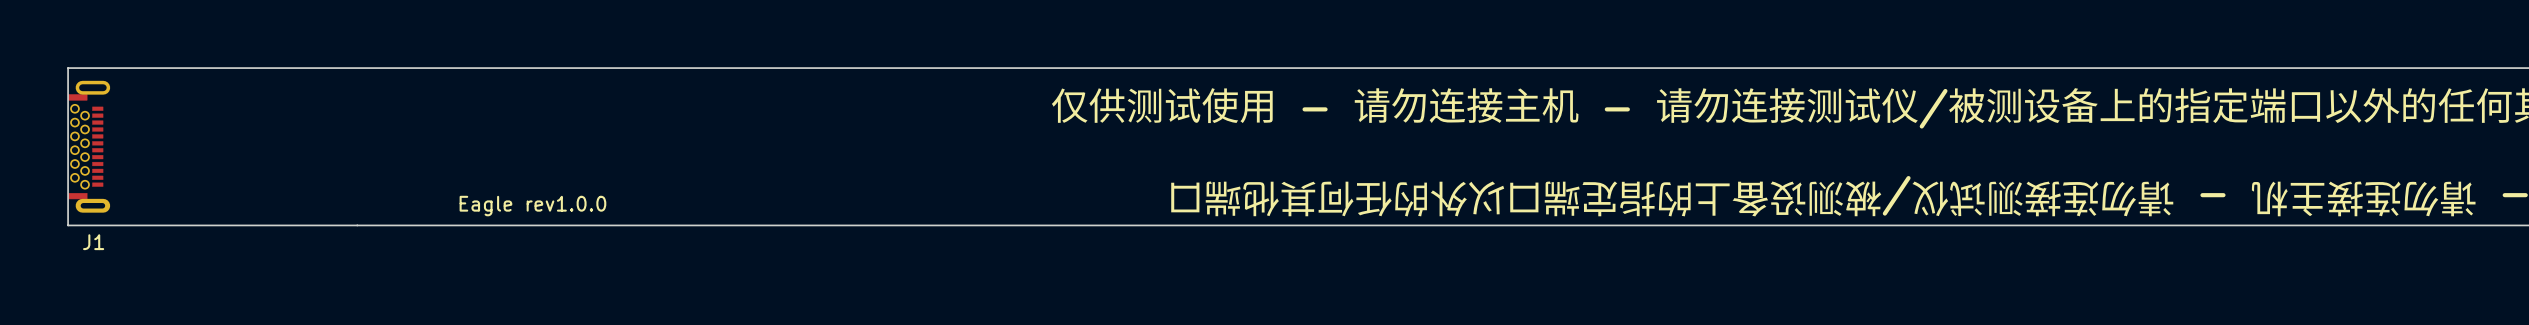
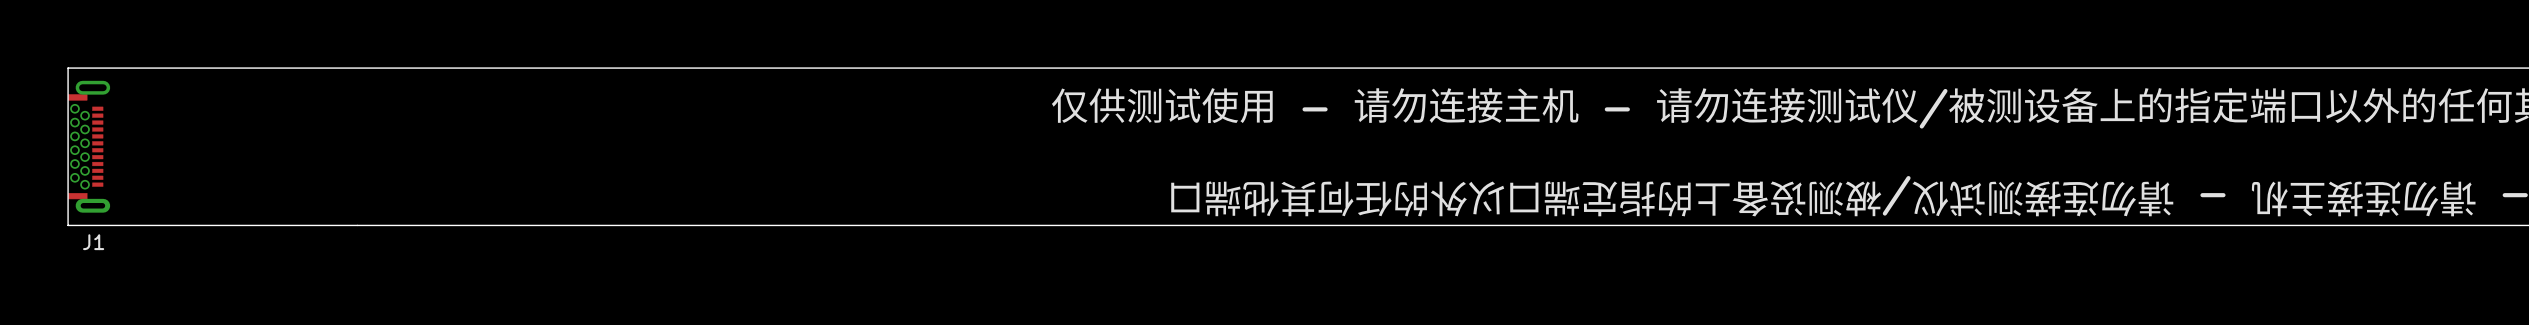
text: Eagle rev1.0.0 (532, 206) -> none

